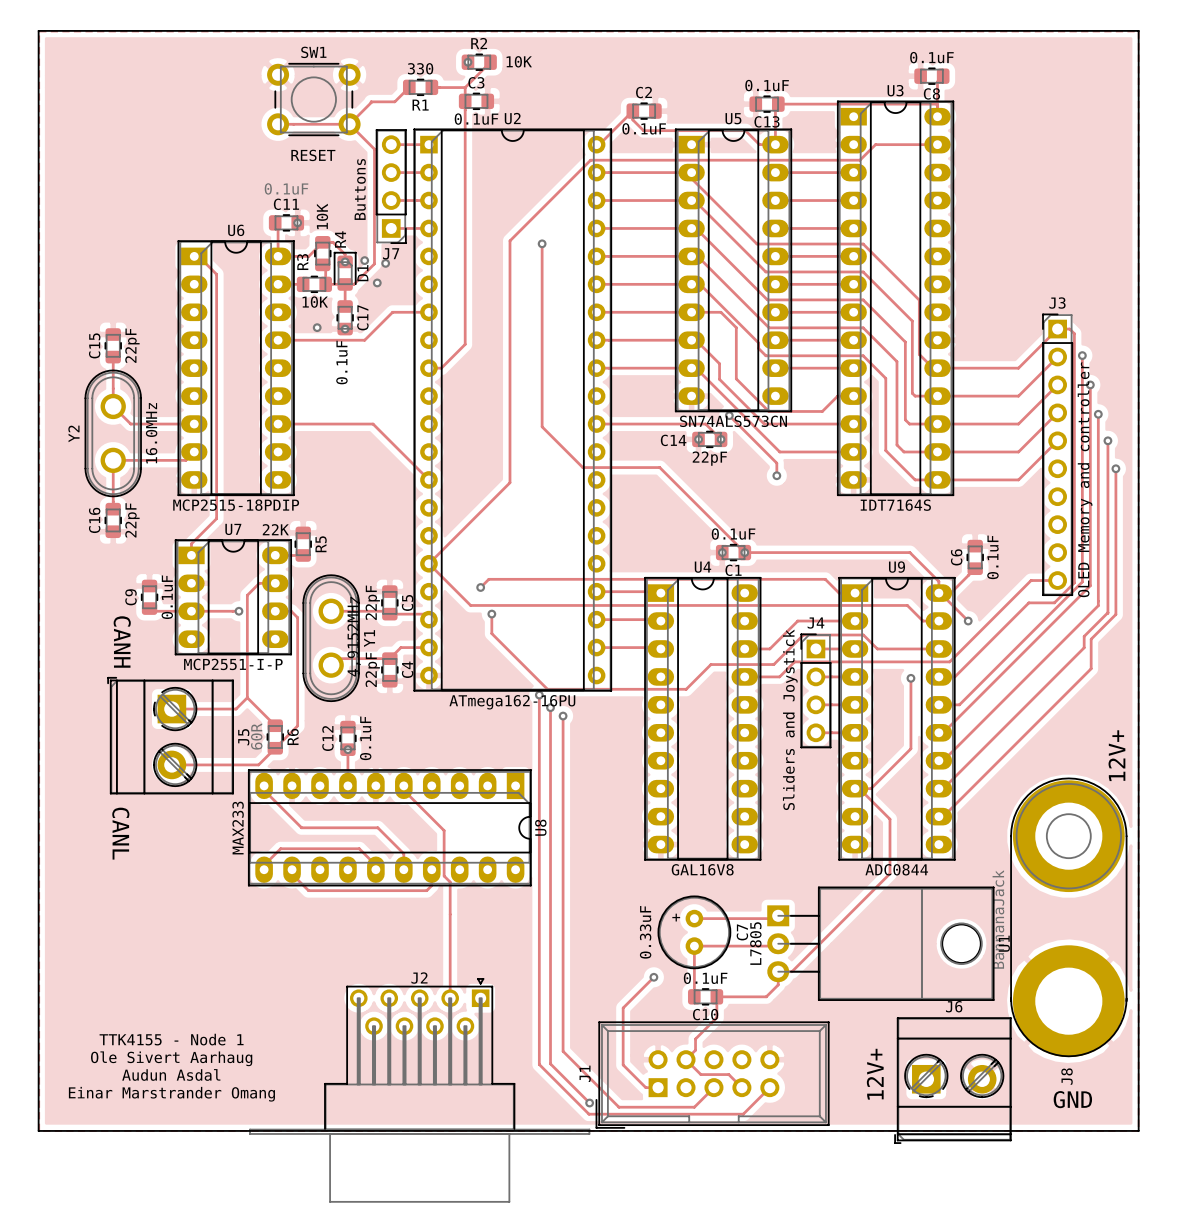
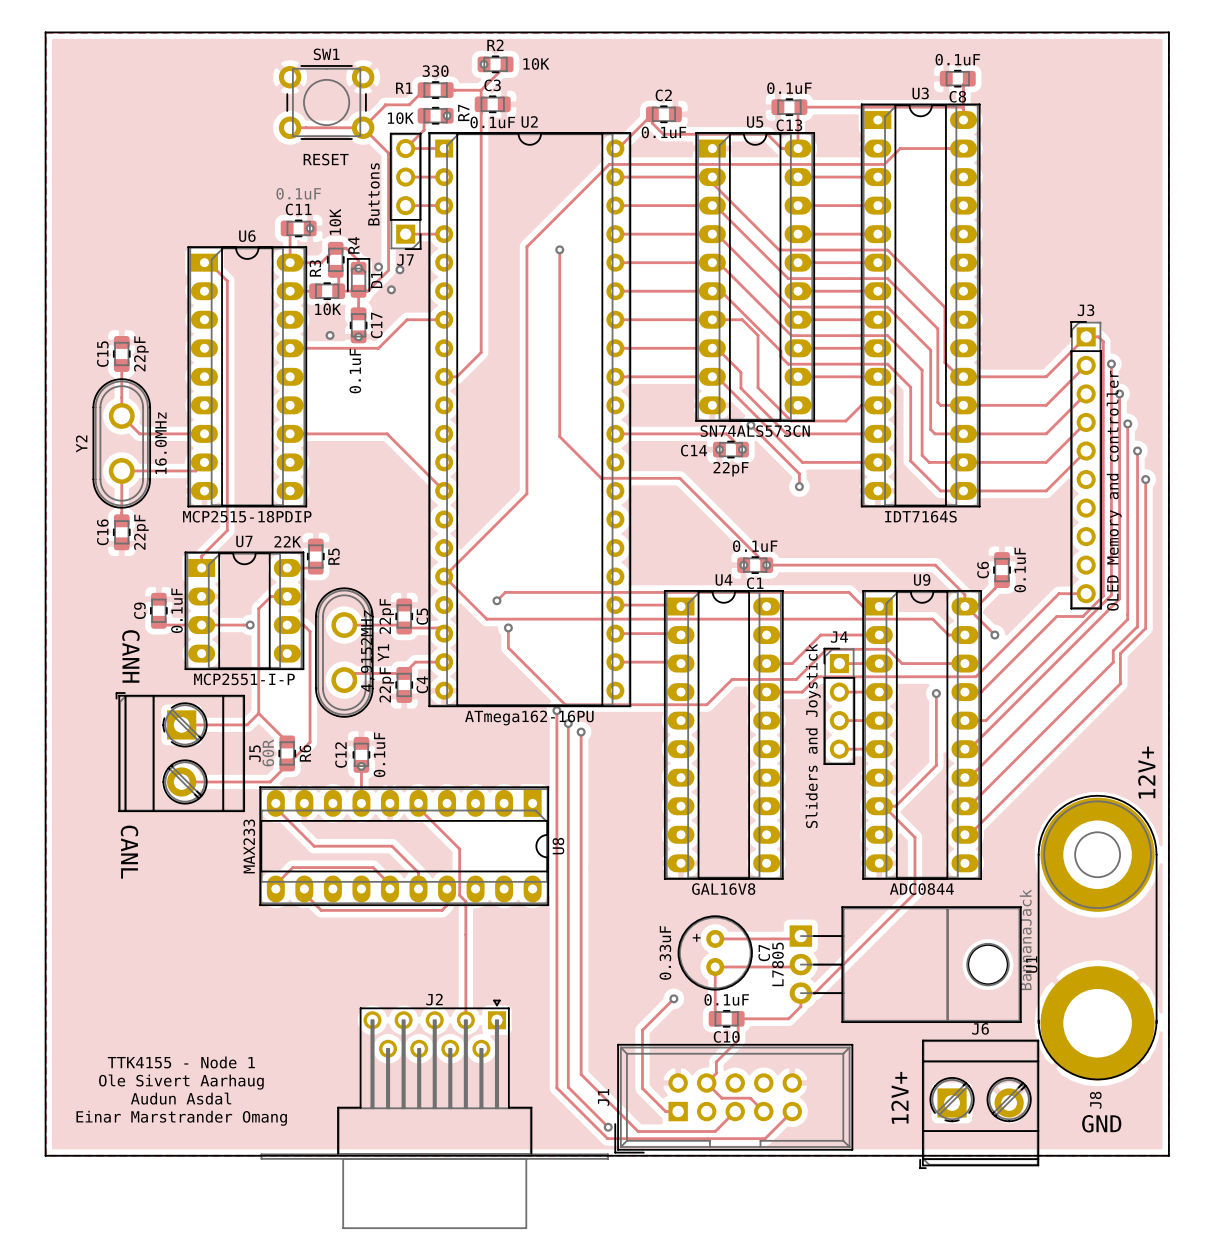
R1 name position: R1 (420, 105) -> R1 (404, 88)
track: none -> (424, 115) (424, 130) (405, 148)
R7: none -> 10K (435, 115)
via: none -> (447, 115)

